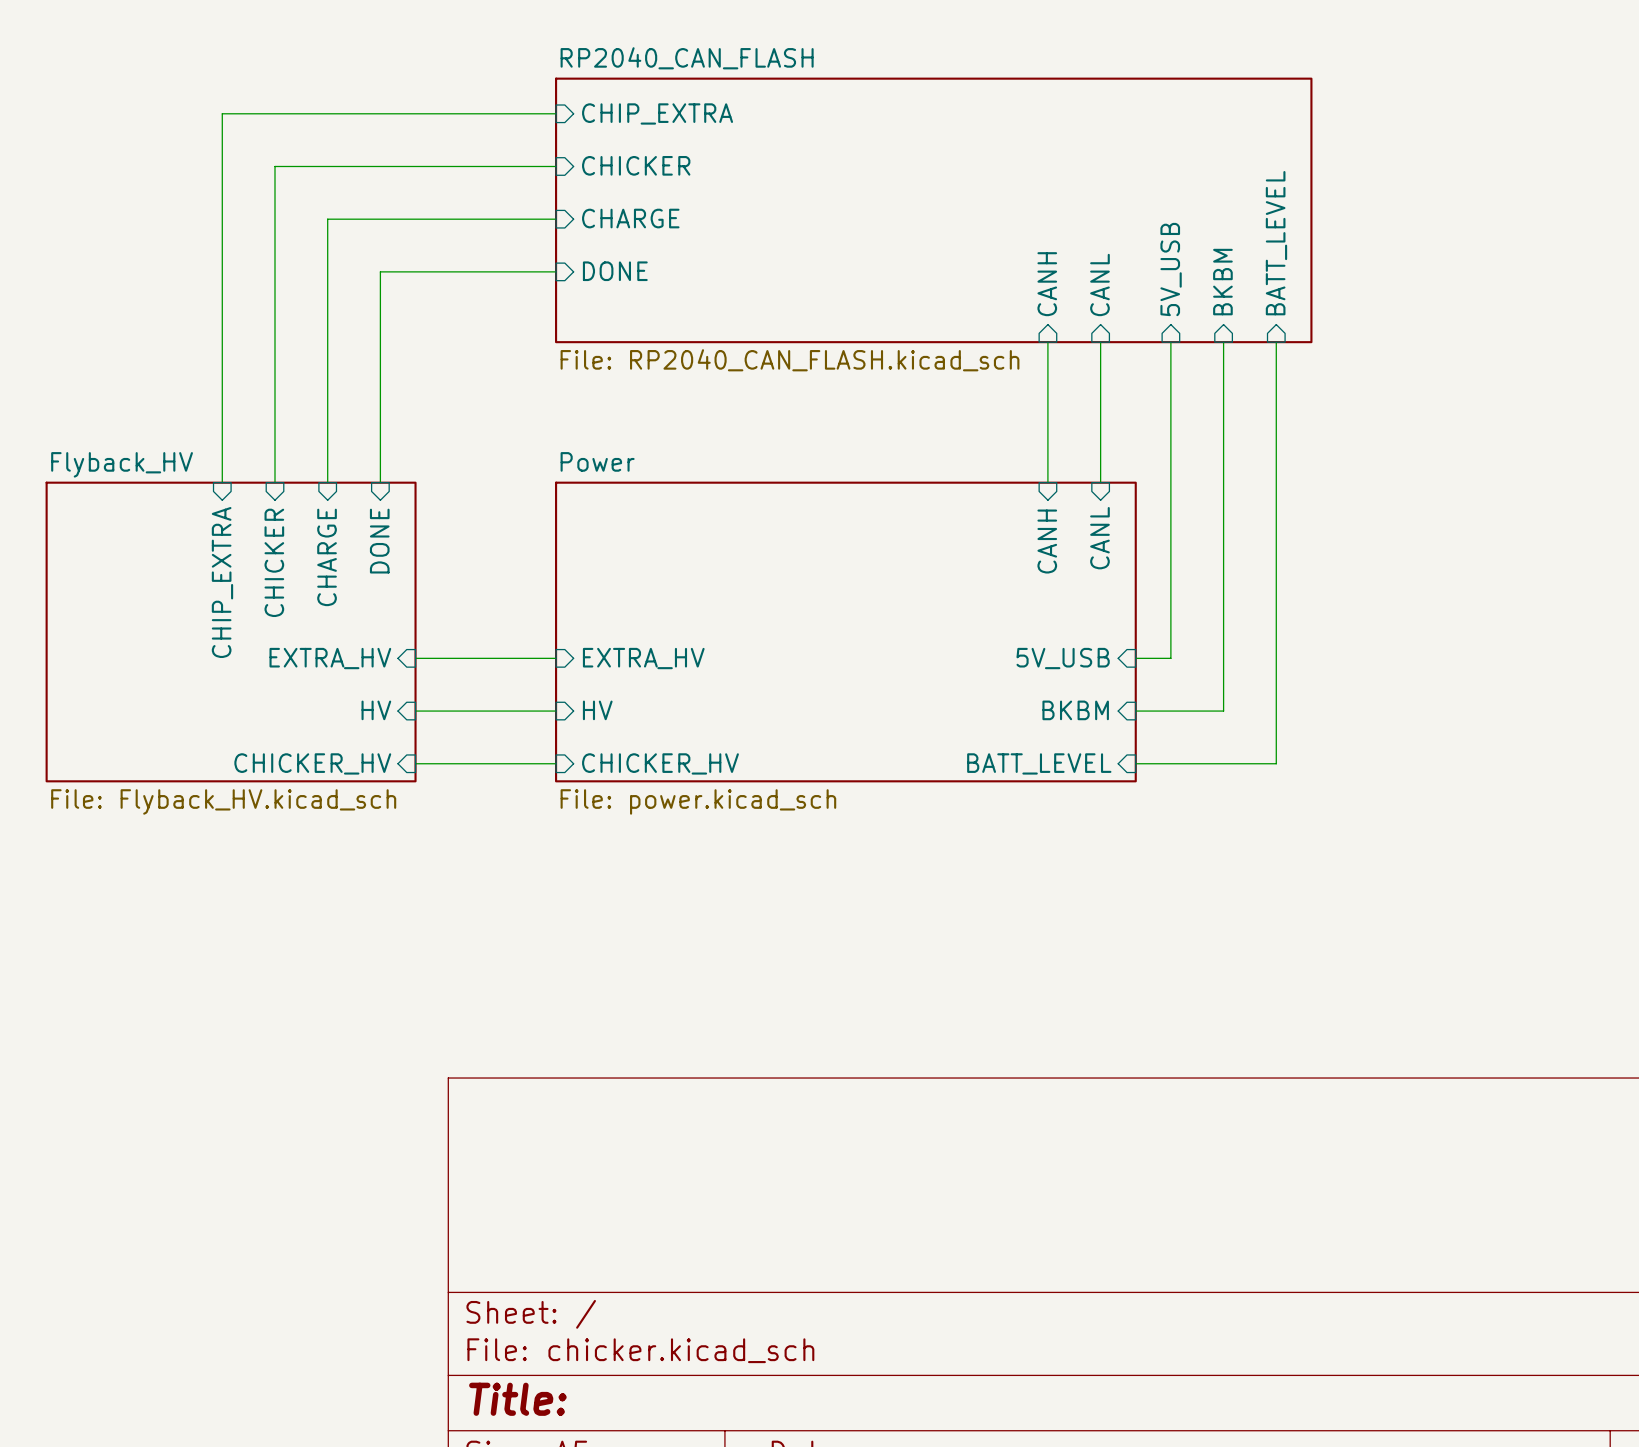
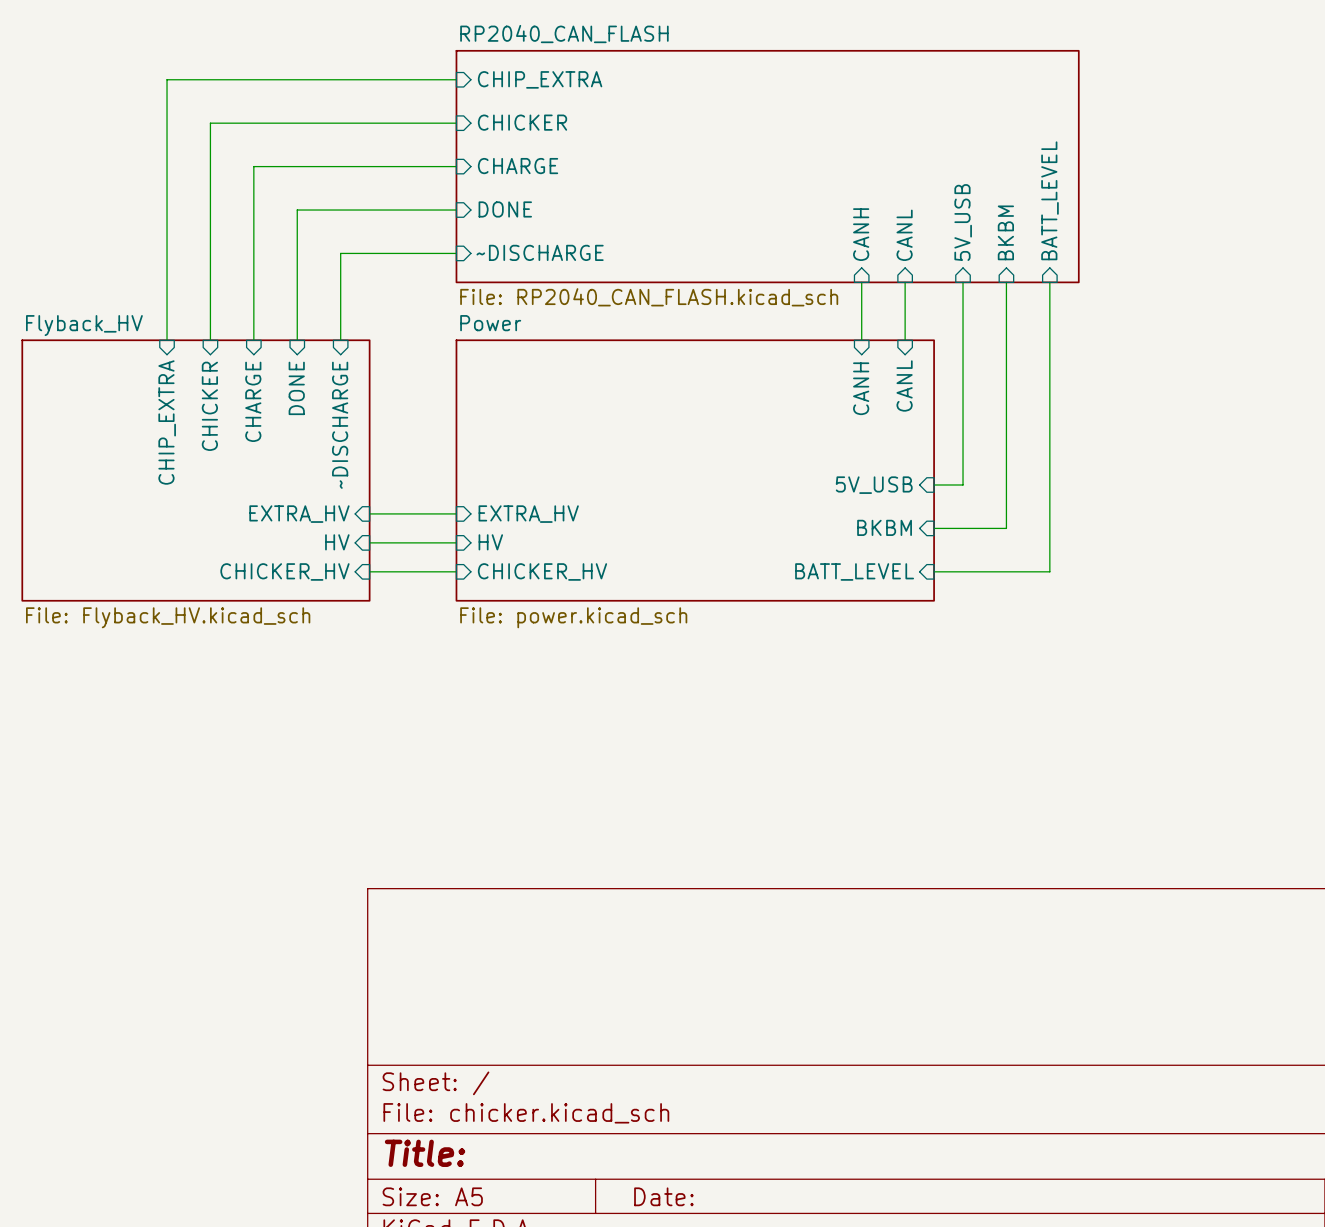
sheet RP2040_CAN_FLASH shape: [555, 77, 1313, 344] -> [455, 49, 1080, 284]
wire: none -> (456, 79) (167, 79) (167, 340)
wire: (556, 113) (222, 113) (222, 482) -> none
sheet pin position: CHIP_EXTRA (657, 113) -> CHIP_EXTRA (540, 79)
wire: none -> (456, 123) (210, 123) (210, 340)
sheet pin position: CHICKER (636, 165) -> CHICKER (522, 122)
wire: (556, 166) (274, 166) (274, 482) -> none
wire: none -> (456, 166) (253, 166) (253, 340)
sheet pin position: CHARGE (630, 218) -> CHARGE (518, 166)
wire: (556, 219) (327, 219) (327, 482) -> none
wire: none -> (456, 210) (297, 210) (297, 340)
wire: (556, 271) (380, 271) (380, 482) -> none
sheet pin position: DONE (615, 271) -> DONE (505, 209)
sheet pin: none -> ~DISCHARGE (540, 252)
wire: none -> (456, 253) (340, 253) (340, 340)
wire: (1047, 412) (1047, 482) -> none
wire: (1100, 412) (1100, 482) -> none
sheet pin: none -> ~DISCHARGE (340, 425)
sheet pin position: CANL (1099, 538) -> CANL (904, 385)
sheet pin position: DONE (379, 541) -> DONE (296, 388)
sheet pin position: CANH (1047, 541) -> CANH (861, 388)
sheet pin position: CHARGE (327, 557) -> CHARGE (253, 401)
sheet pin position: CHICKER (274, 562) -> CHICKER (209, 406)
sheet Flyback_HV: none -> File: Flyback_HV.kicad_sch (195, 470)
sheet Power: none -> File: power.kicad_sch (695, 470)
sheet pin position: CHIP_EXTRA (222, 582) -> CHIP_EXTRA (167, 422)
wire: (1170, 588) (1170, 658) (1135, 658) -> (963, 484) (934, 484)
wire: none -> (369, 513) (456, 513)
sheet pin: none -> EXTRA_HV (528, 514)
sheet Flyback_HV: File: Flyback_HV.kicad_sch (231, 632) -> none
sheet Power: File: power.kicad_sch (845, 632) -> none
wire: (1223, 640) (1223, 711) (1135, 711) -> (1006, 528) (934, 528)
sheet pin position: EXTRA_HV (330, 658) -> EXTRA_HV (299, 514)
wire: (415, 658) (450, 658) -> none
sheet pin: EXTRA_HV (643, 658) -> HV (490, 542)
sheet pin position: 5V_USB (1063, 658) -> 5V_USB (874, 485)
wire: none -> (369, 571) (456, 571)
wire: (1276, 693) (1276, 763) (1135, 763) -> (1049, 571) (934, 571)
sheet pin position: HV (376, 710) -> HV (337, 542)
sheet pin: HV (597, 710) -> none
sheet pin position: BKBM (1075, 710) -> BKBM (884, 527)
wire: (415, 711) (556, 711) -> none
sheet pin position: CHICKER_HV (312, 763) -> CHICKER_HV (284, 571)
wire: (415, 763) (556, 763) -> none
sheet pin position: CHICKER_HV (660, 763) -> CHICKER_HV (542, 571)
sheet pin position: BATT_LEVEL (1039, 763) -> BATT_LEVEL (854, 571)

